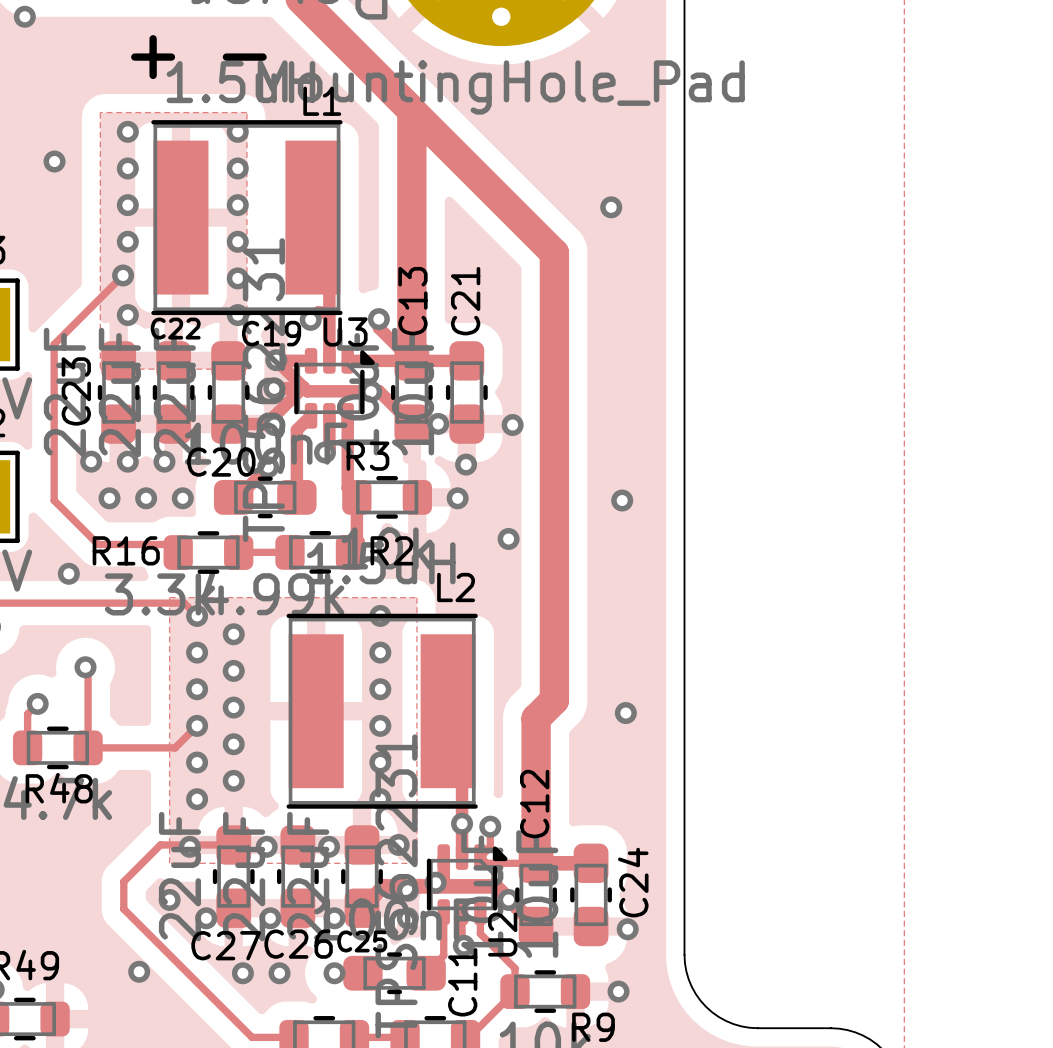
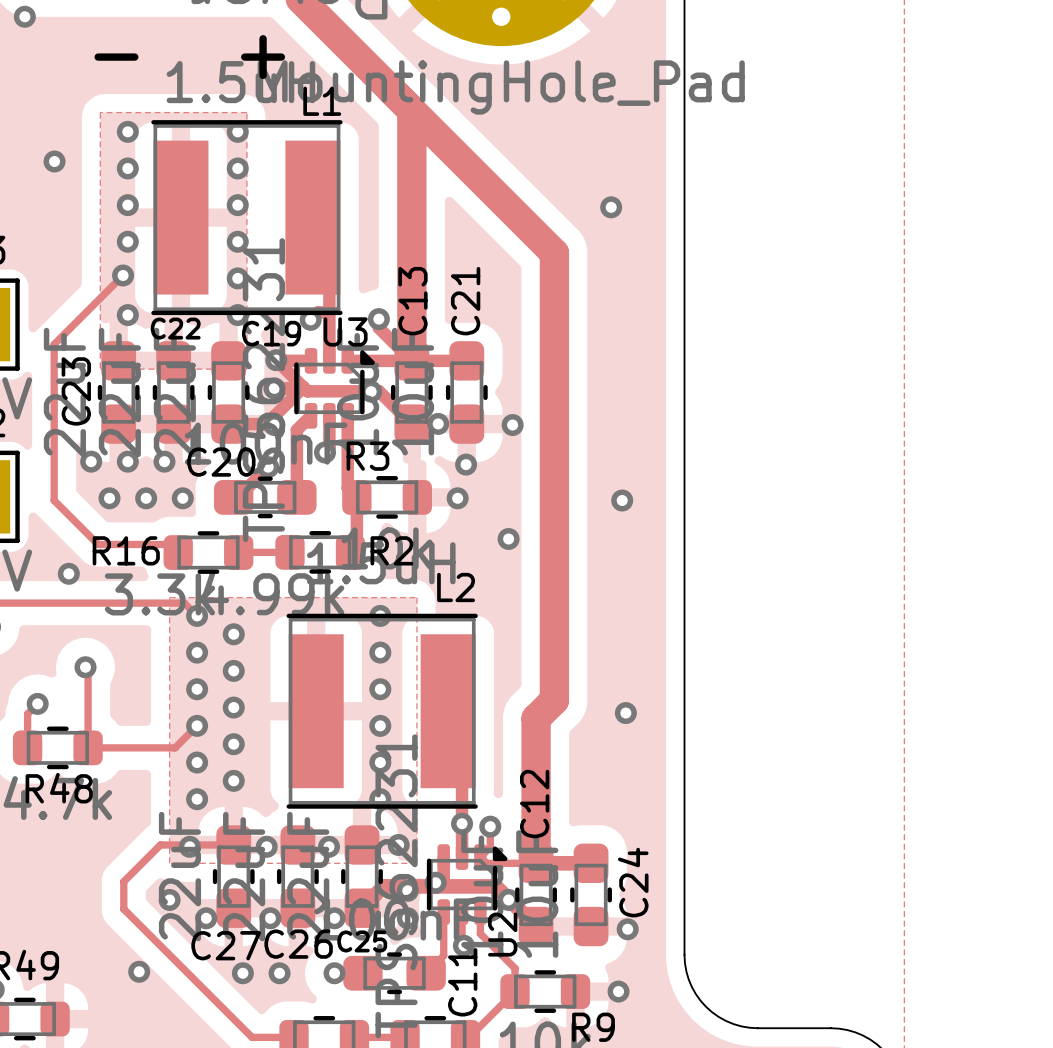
line: (153, 38) (153, 75) -> (263, 38) (263, 75)
line: (134, 57) (171, 57) -> (134, 57) (98, 57)
line: (226, 57) (244, 57) -> (263, 57) (281, 57)

